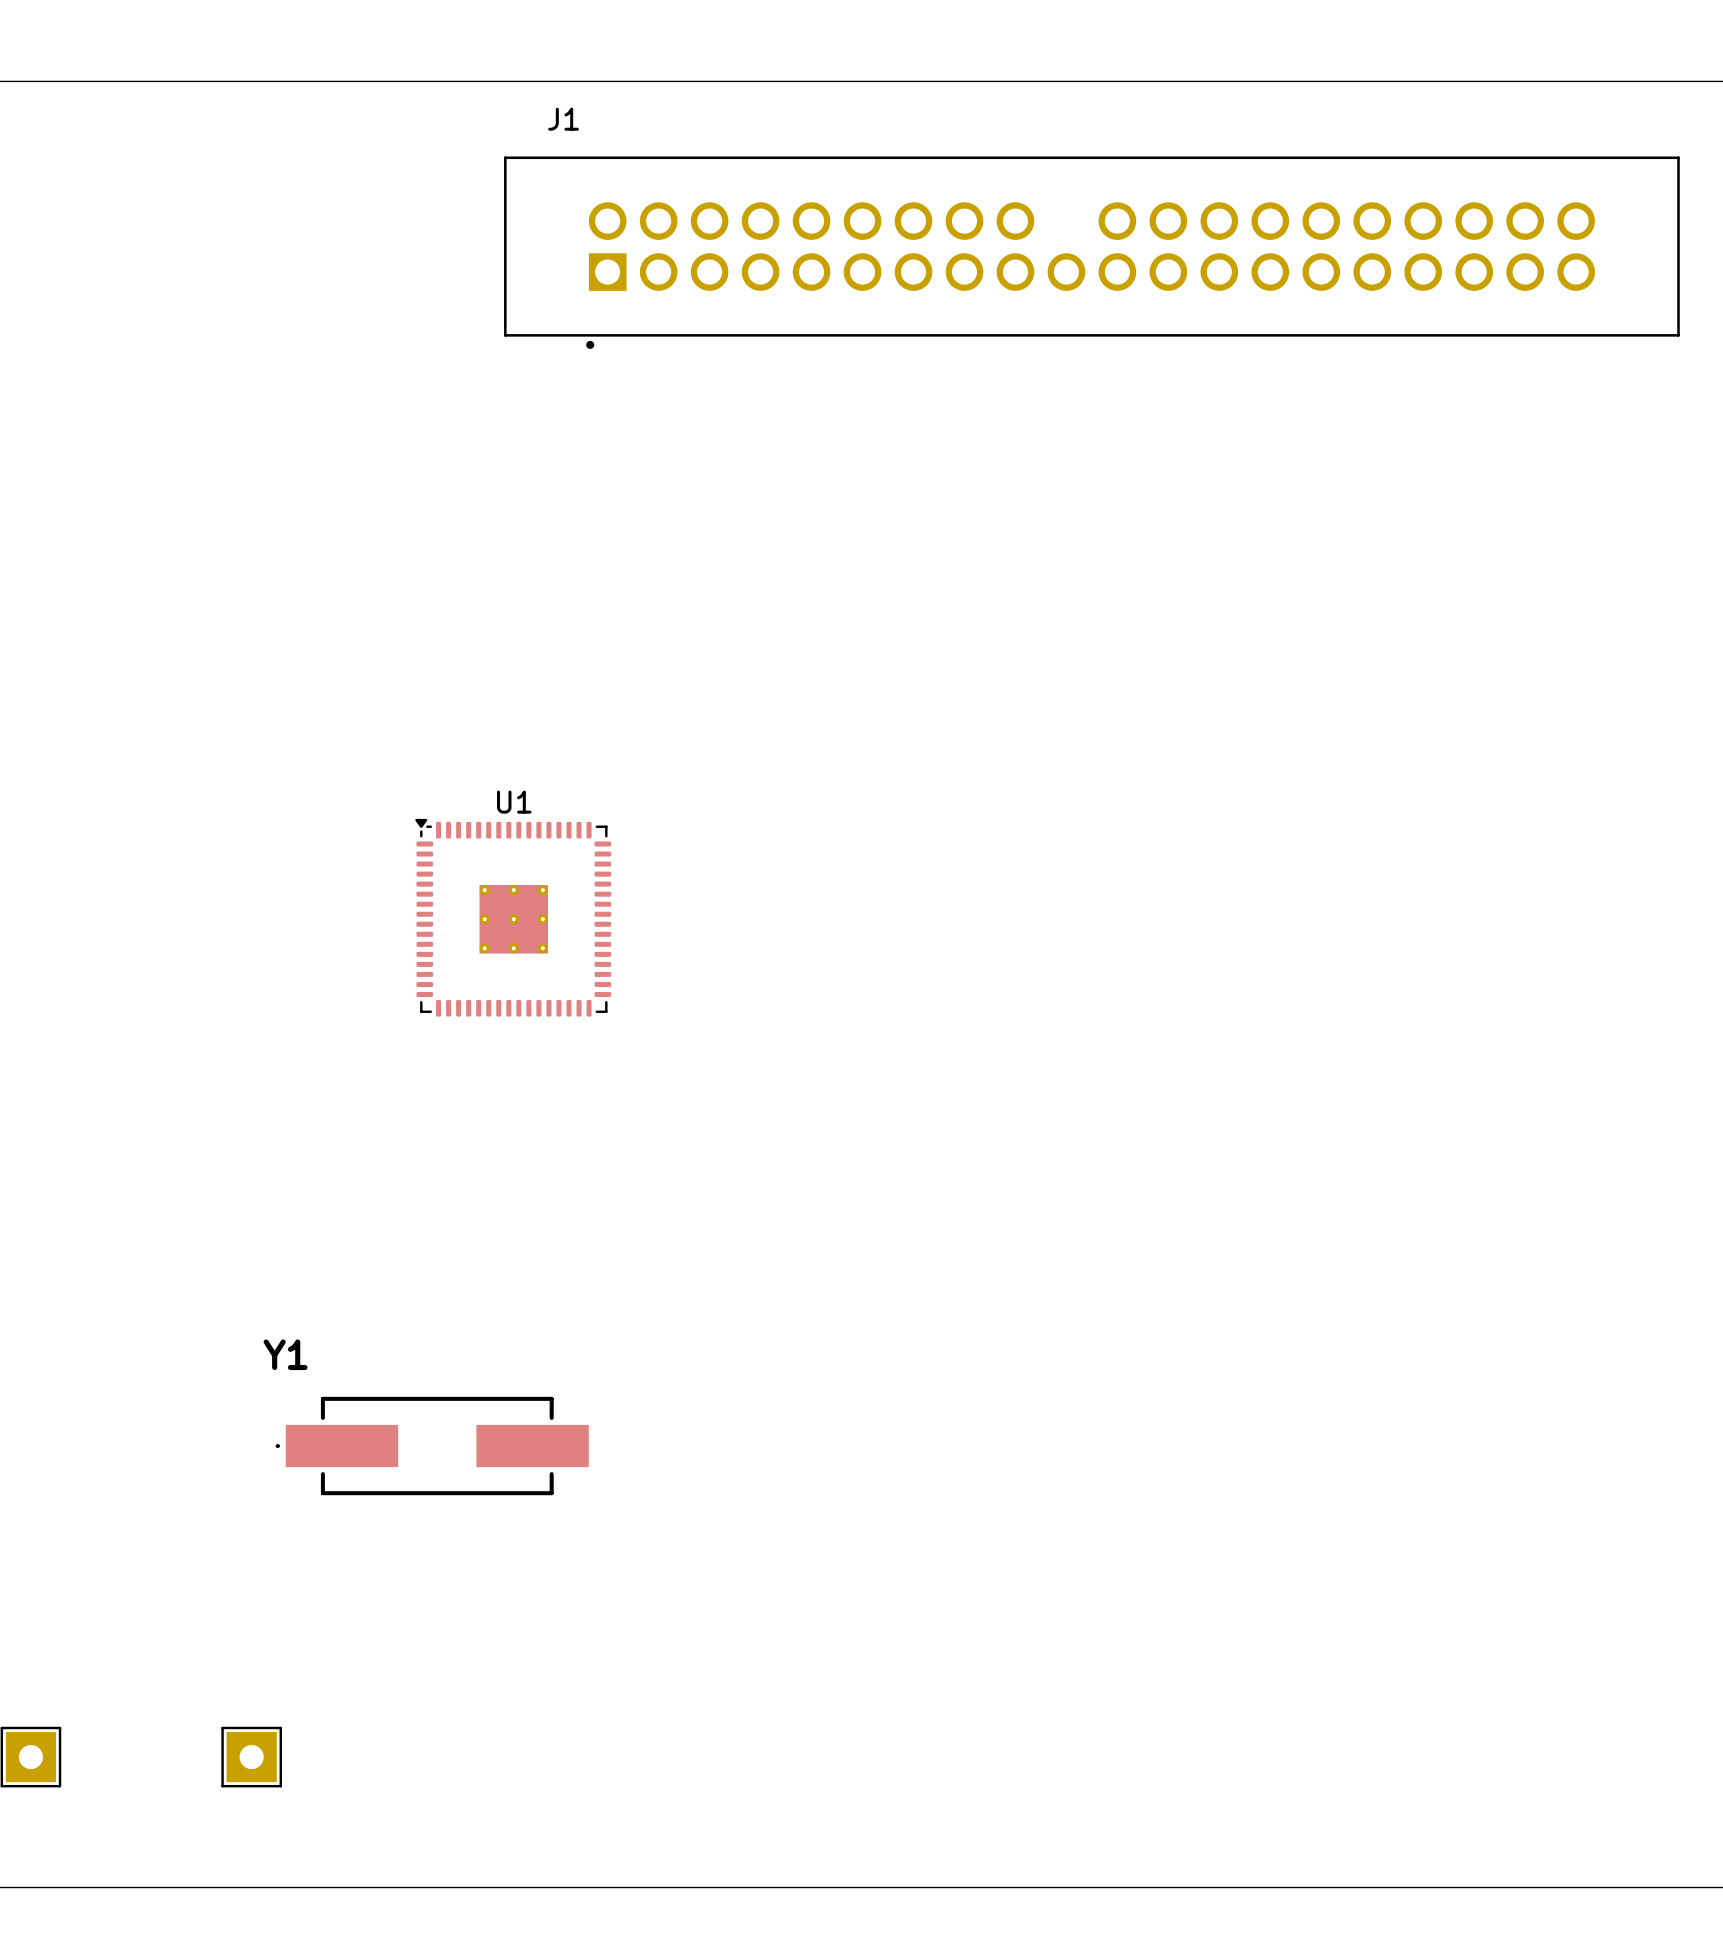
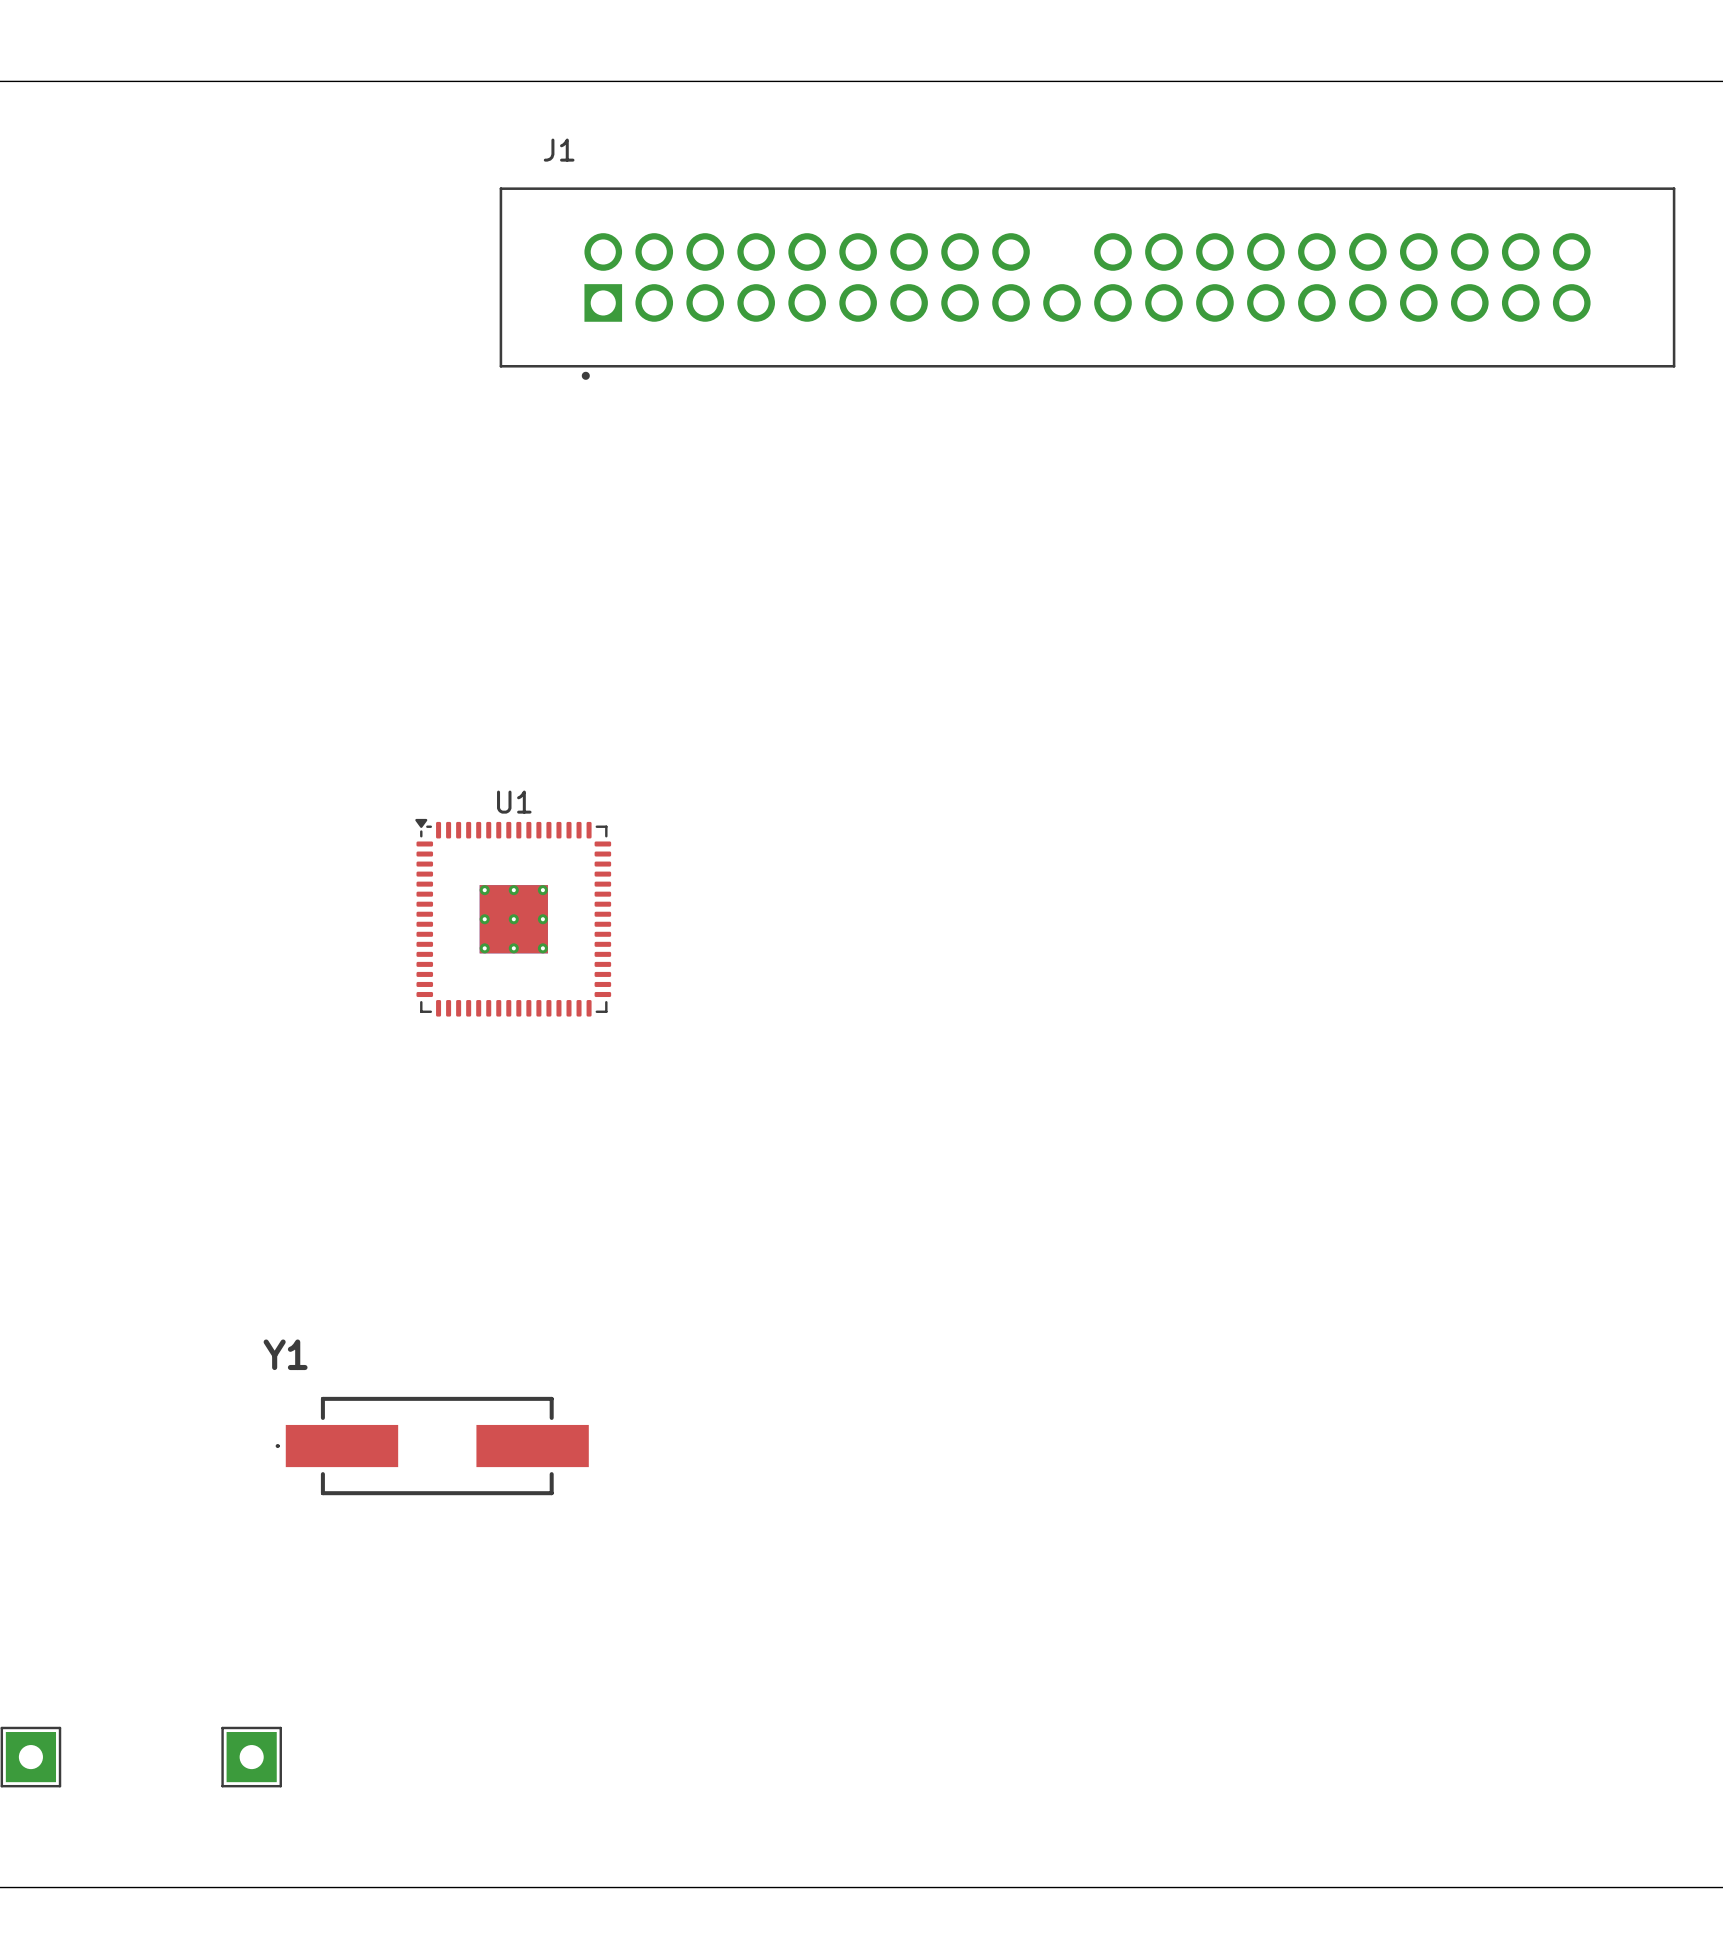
J1 position: (1091, 252) -> (1087, 283)

